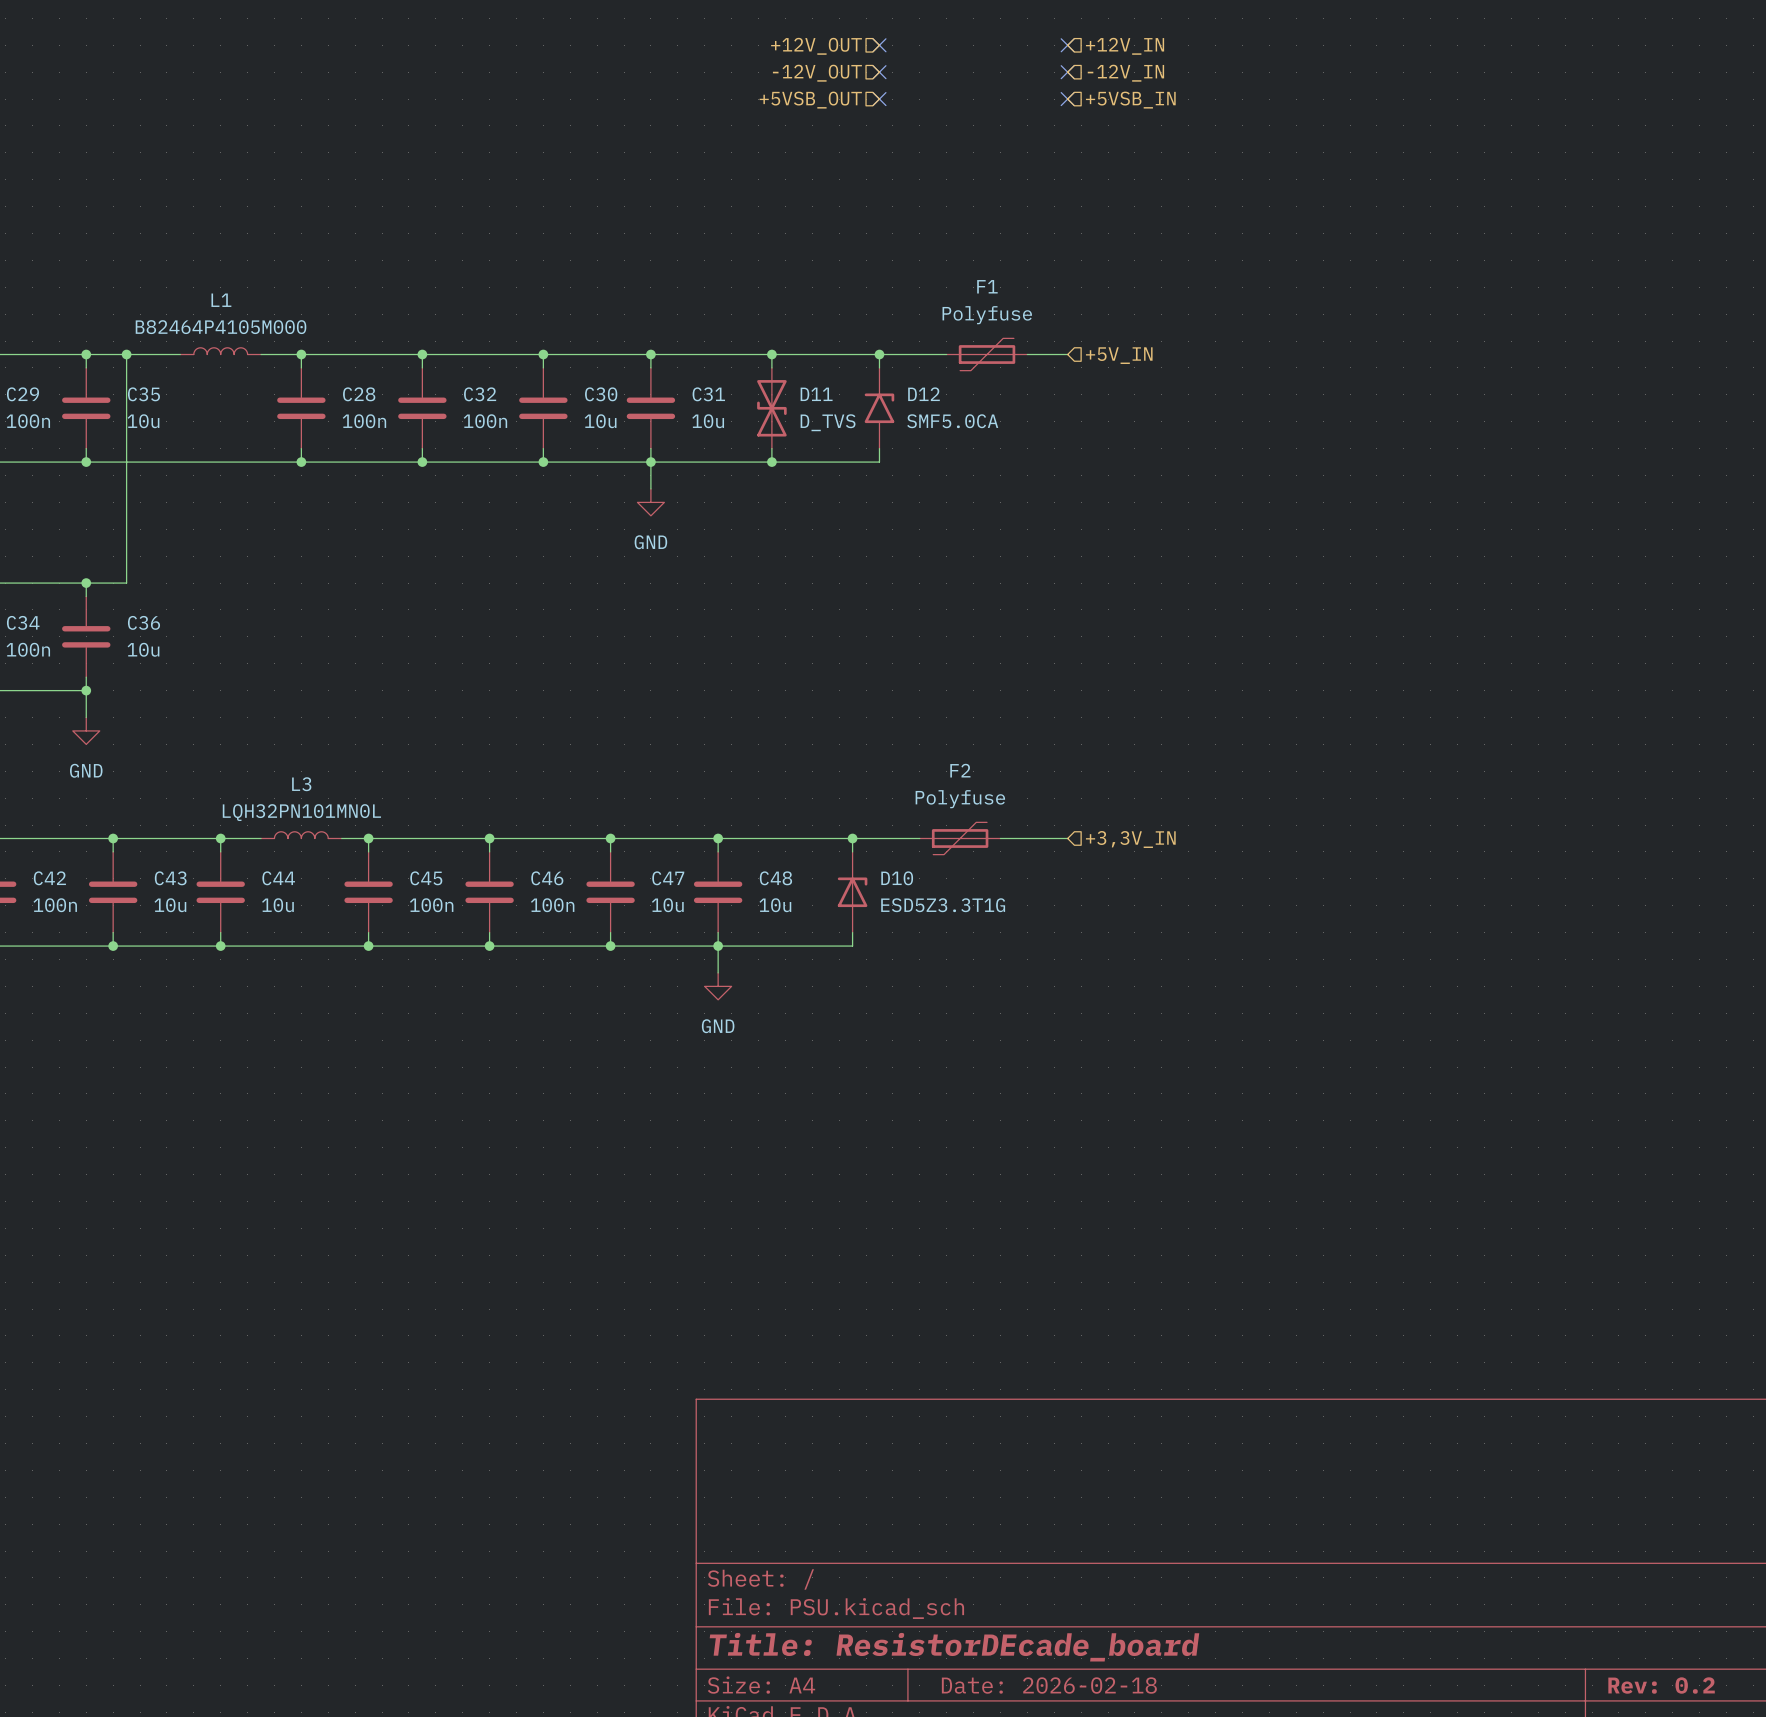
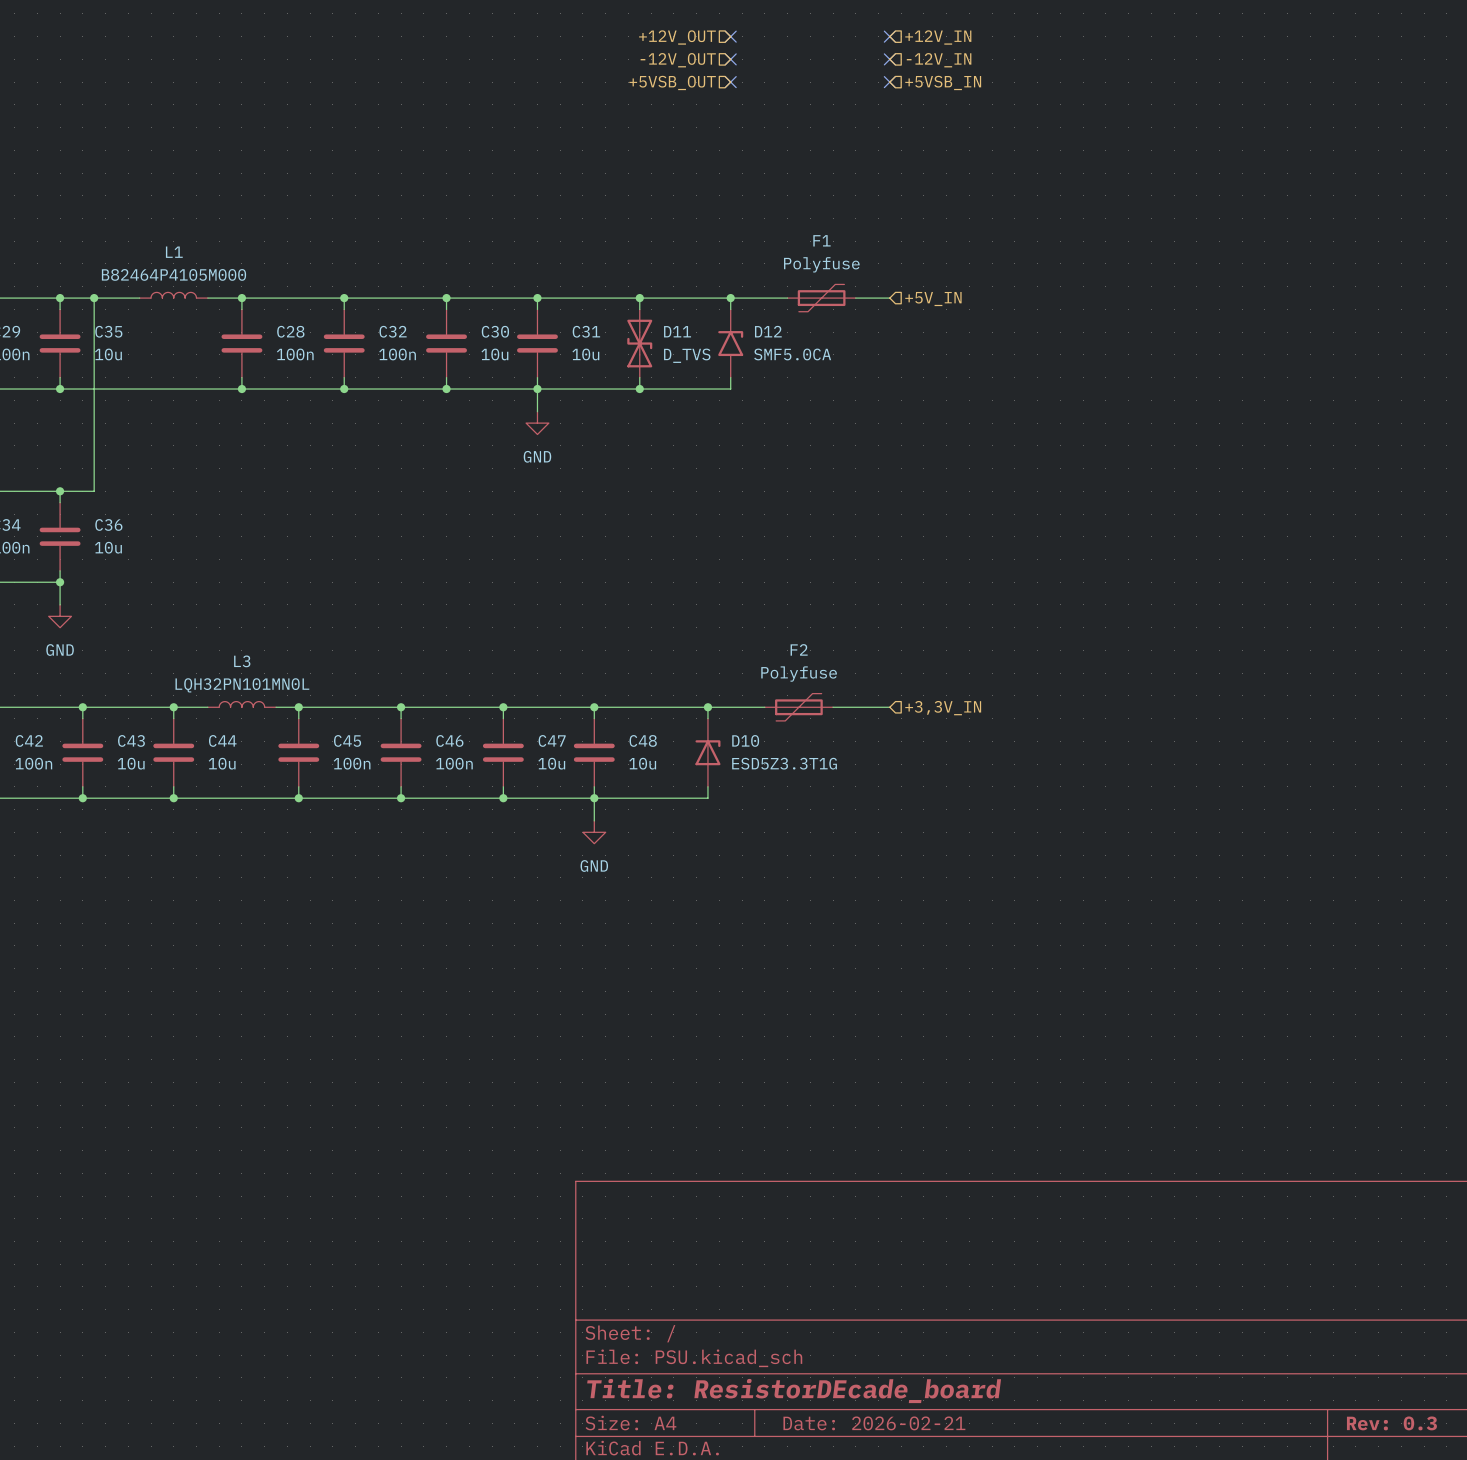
title block: Date: 2026-02-18 (1049, 1685) -> Date: 2026-02-21 (874, 1423)
title block: Rev: 0.2 (1661, 1685) -> Rev: 0.3 (1391, 1423)

